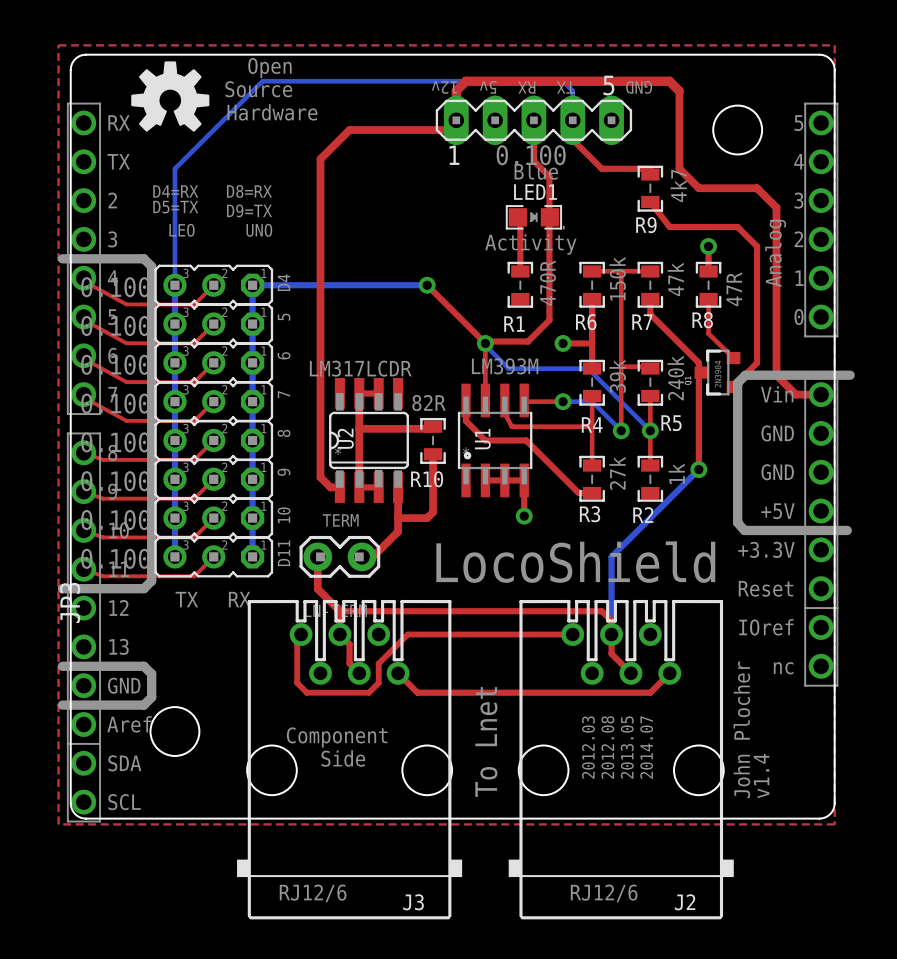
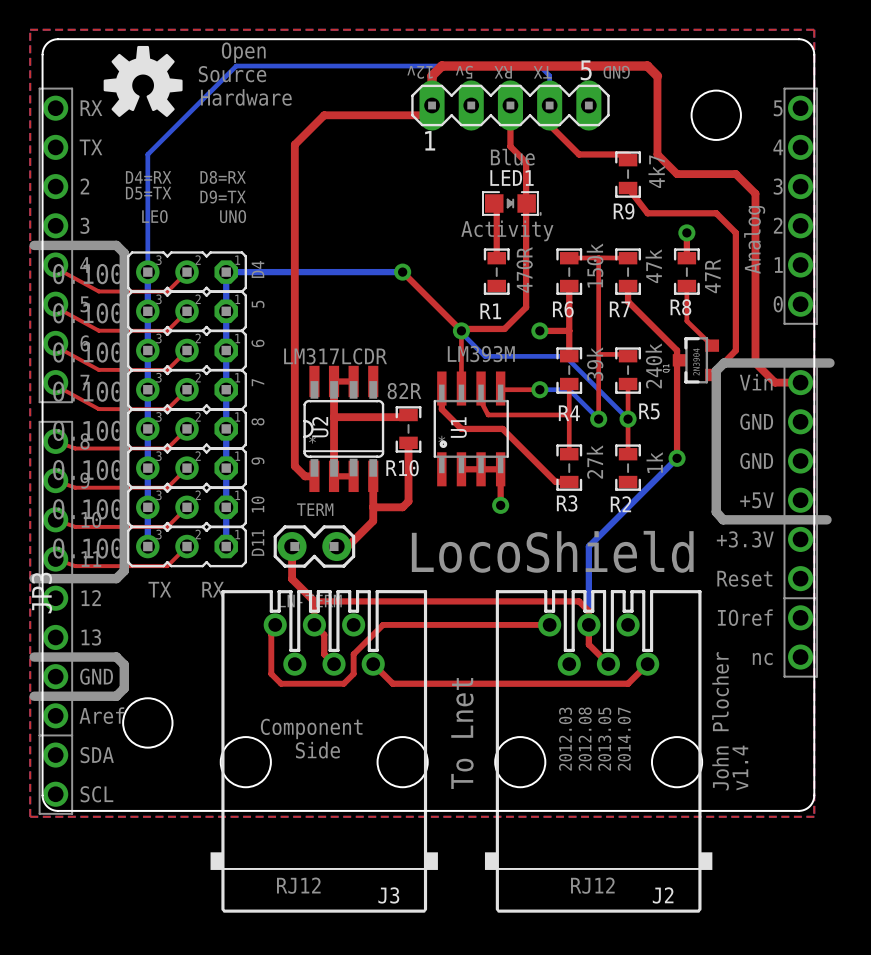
part value: 0.100 (531, 155) -> none
J3 value: RJ12/6 (313, 893) -> RJ12 (298, 885)
J2 value: RJ12/6 (604, 893) -> RJ12 (592, 885)

